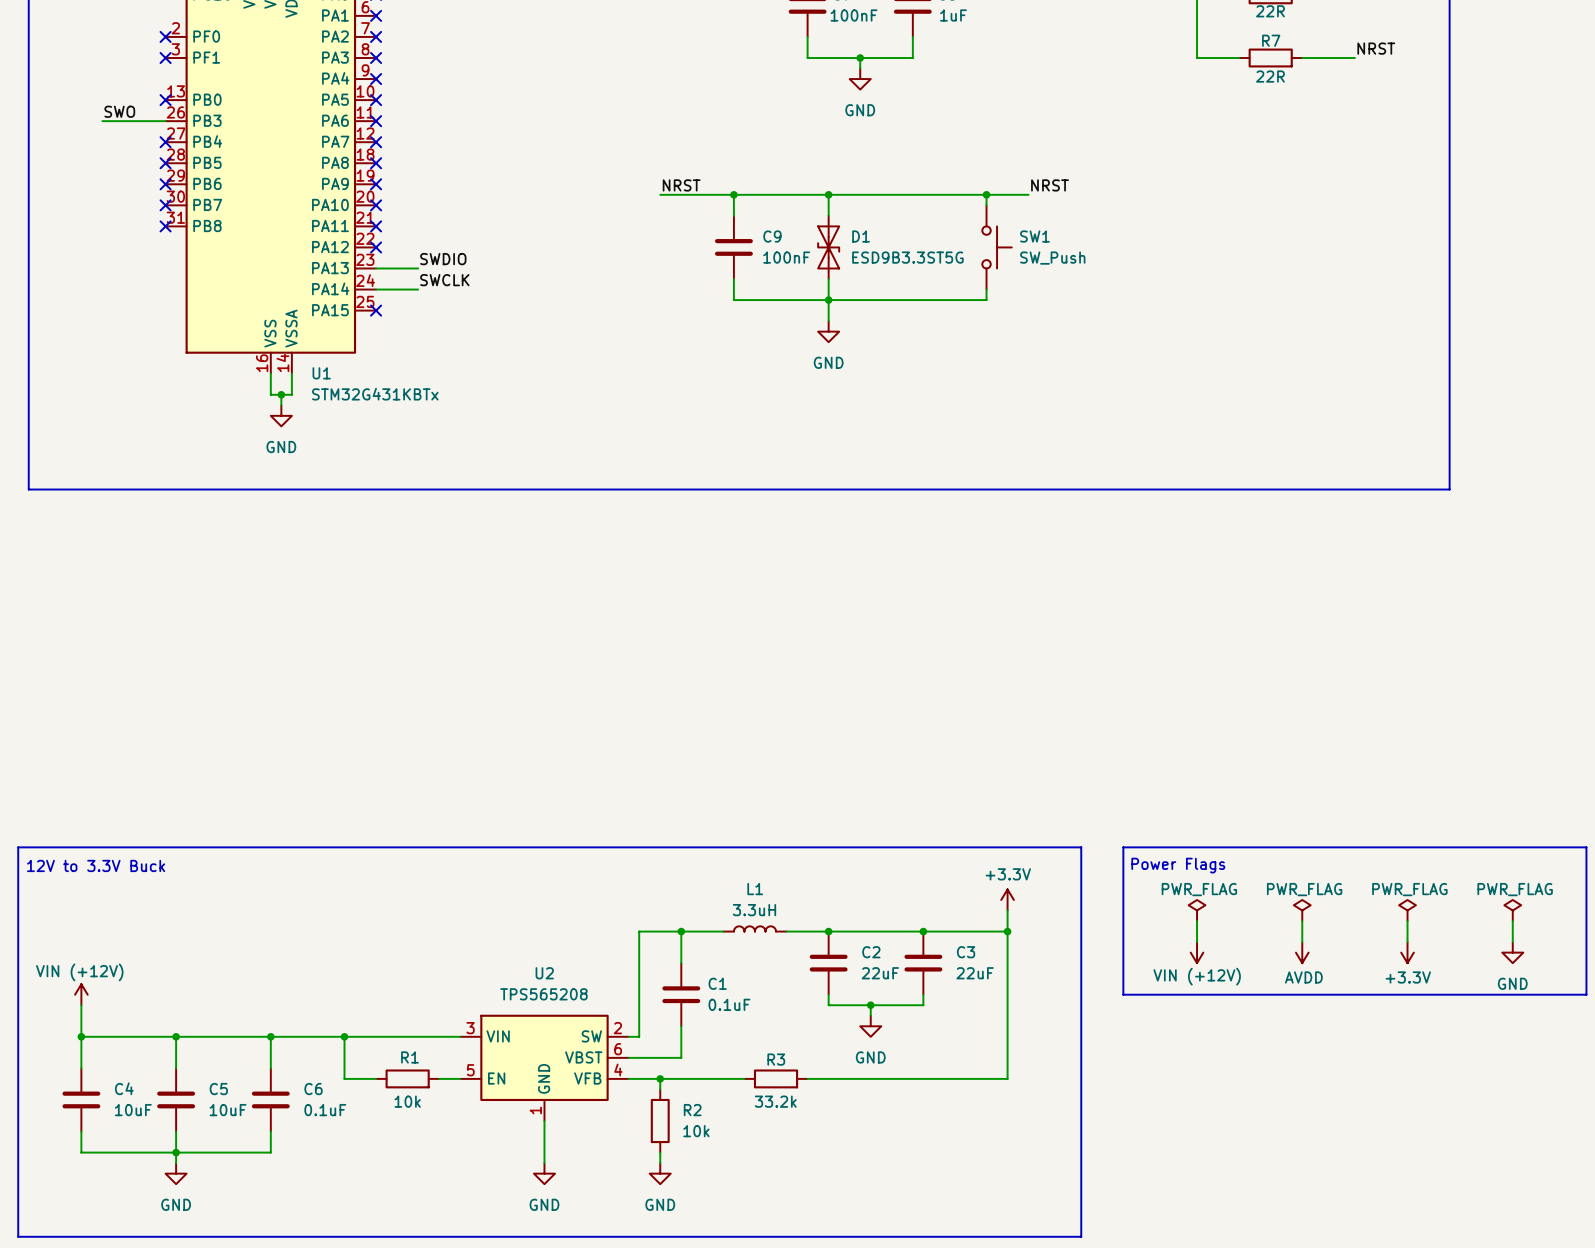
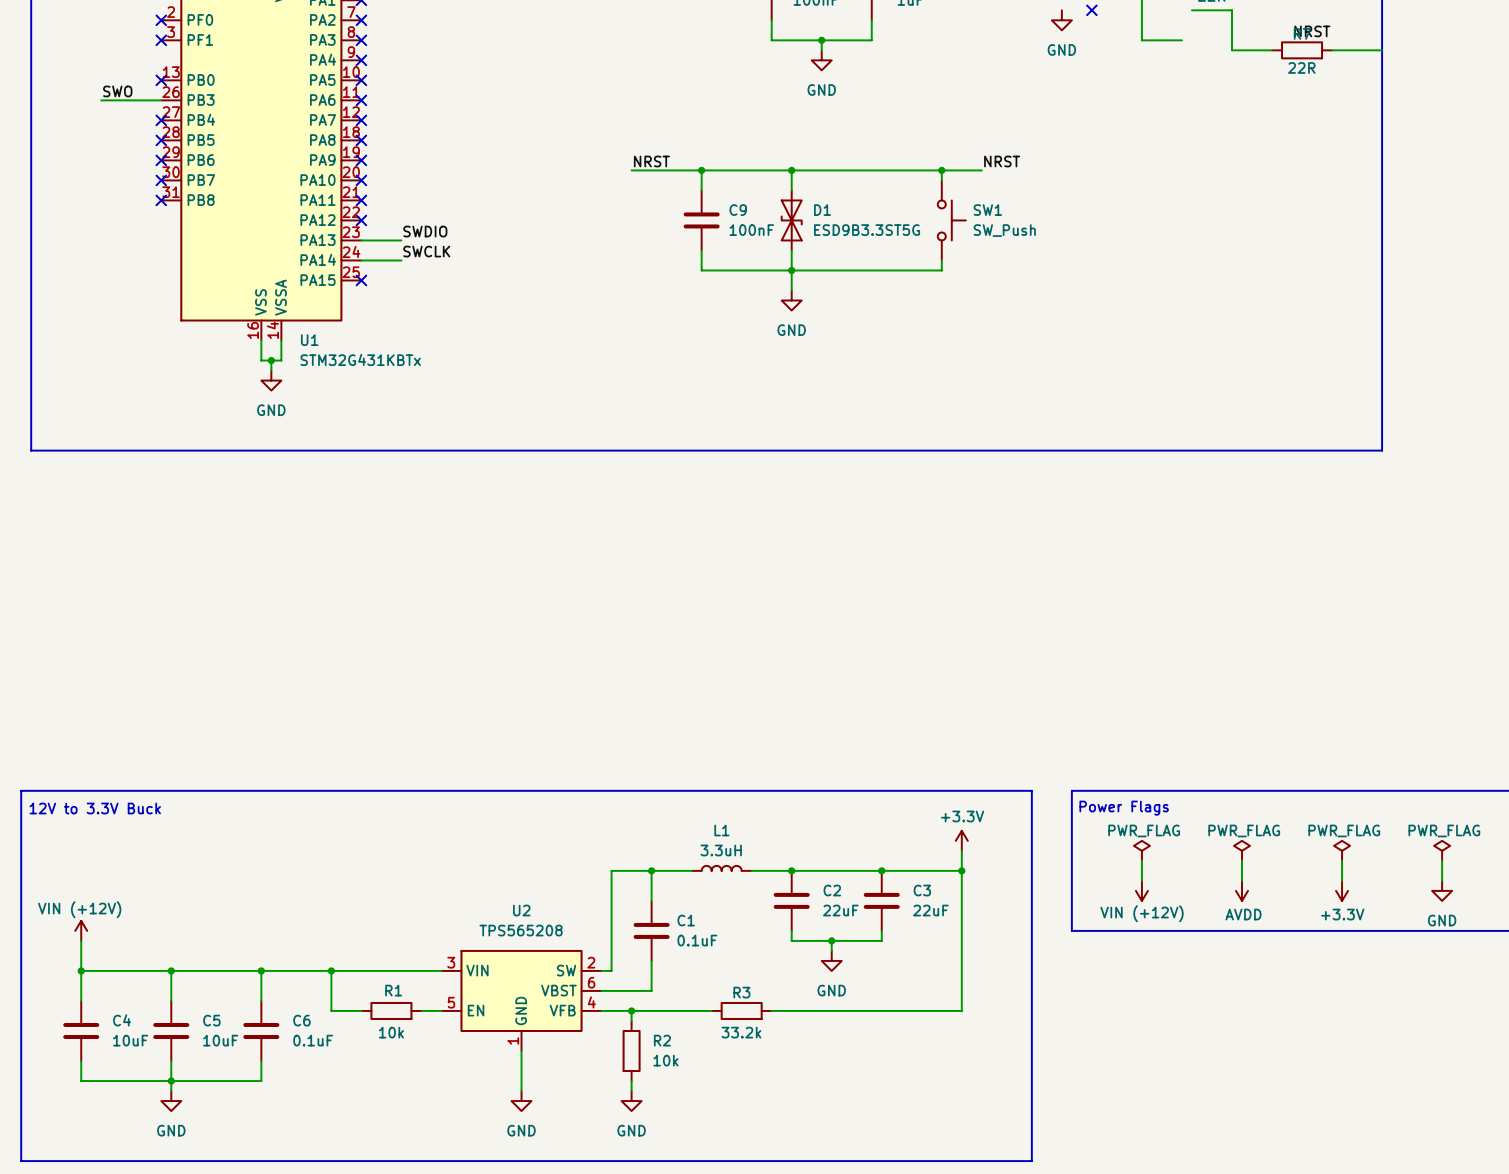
no-connect mark: none -> (1091, 10)
wire: none -> (1191, 10) (1231, 10) (1231, 50) (1272, 50)
power symbol: none -> GND (1061, 20)
R7 position: (1270, 57) -> (1302, 50)
wire: (1302, 57) (1354, 57) -> (1332, 50) (1382, 50)

